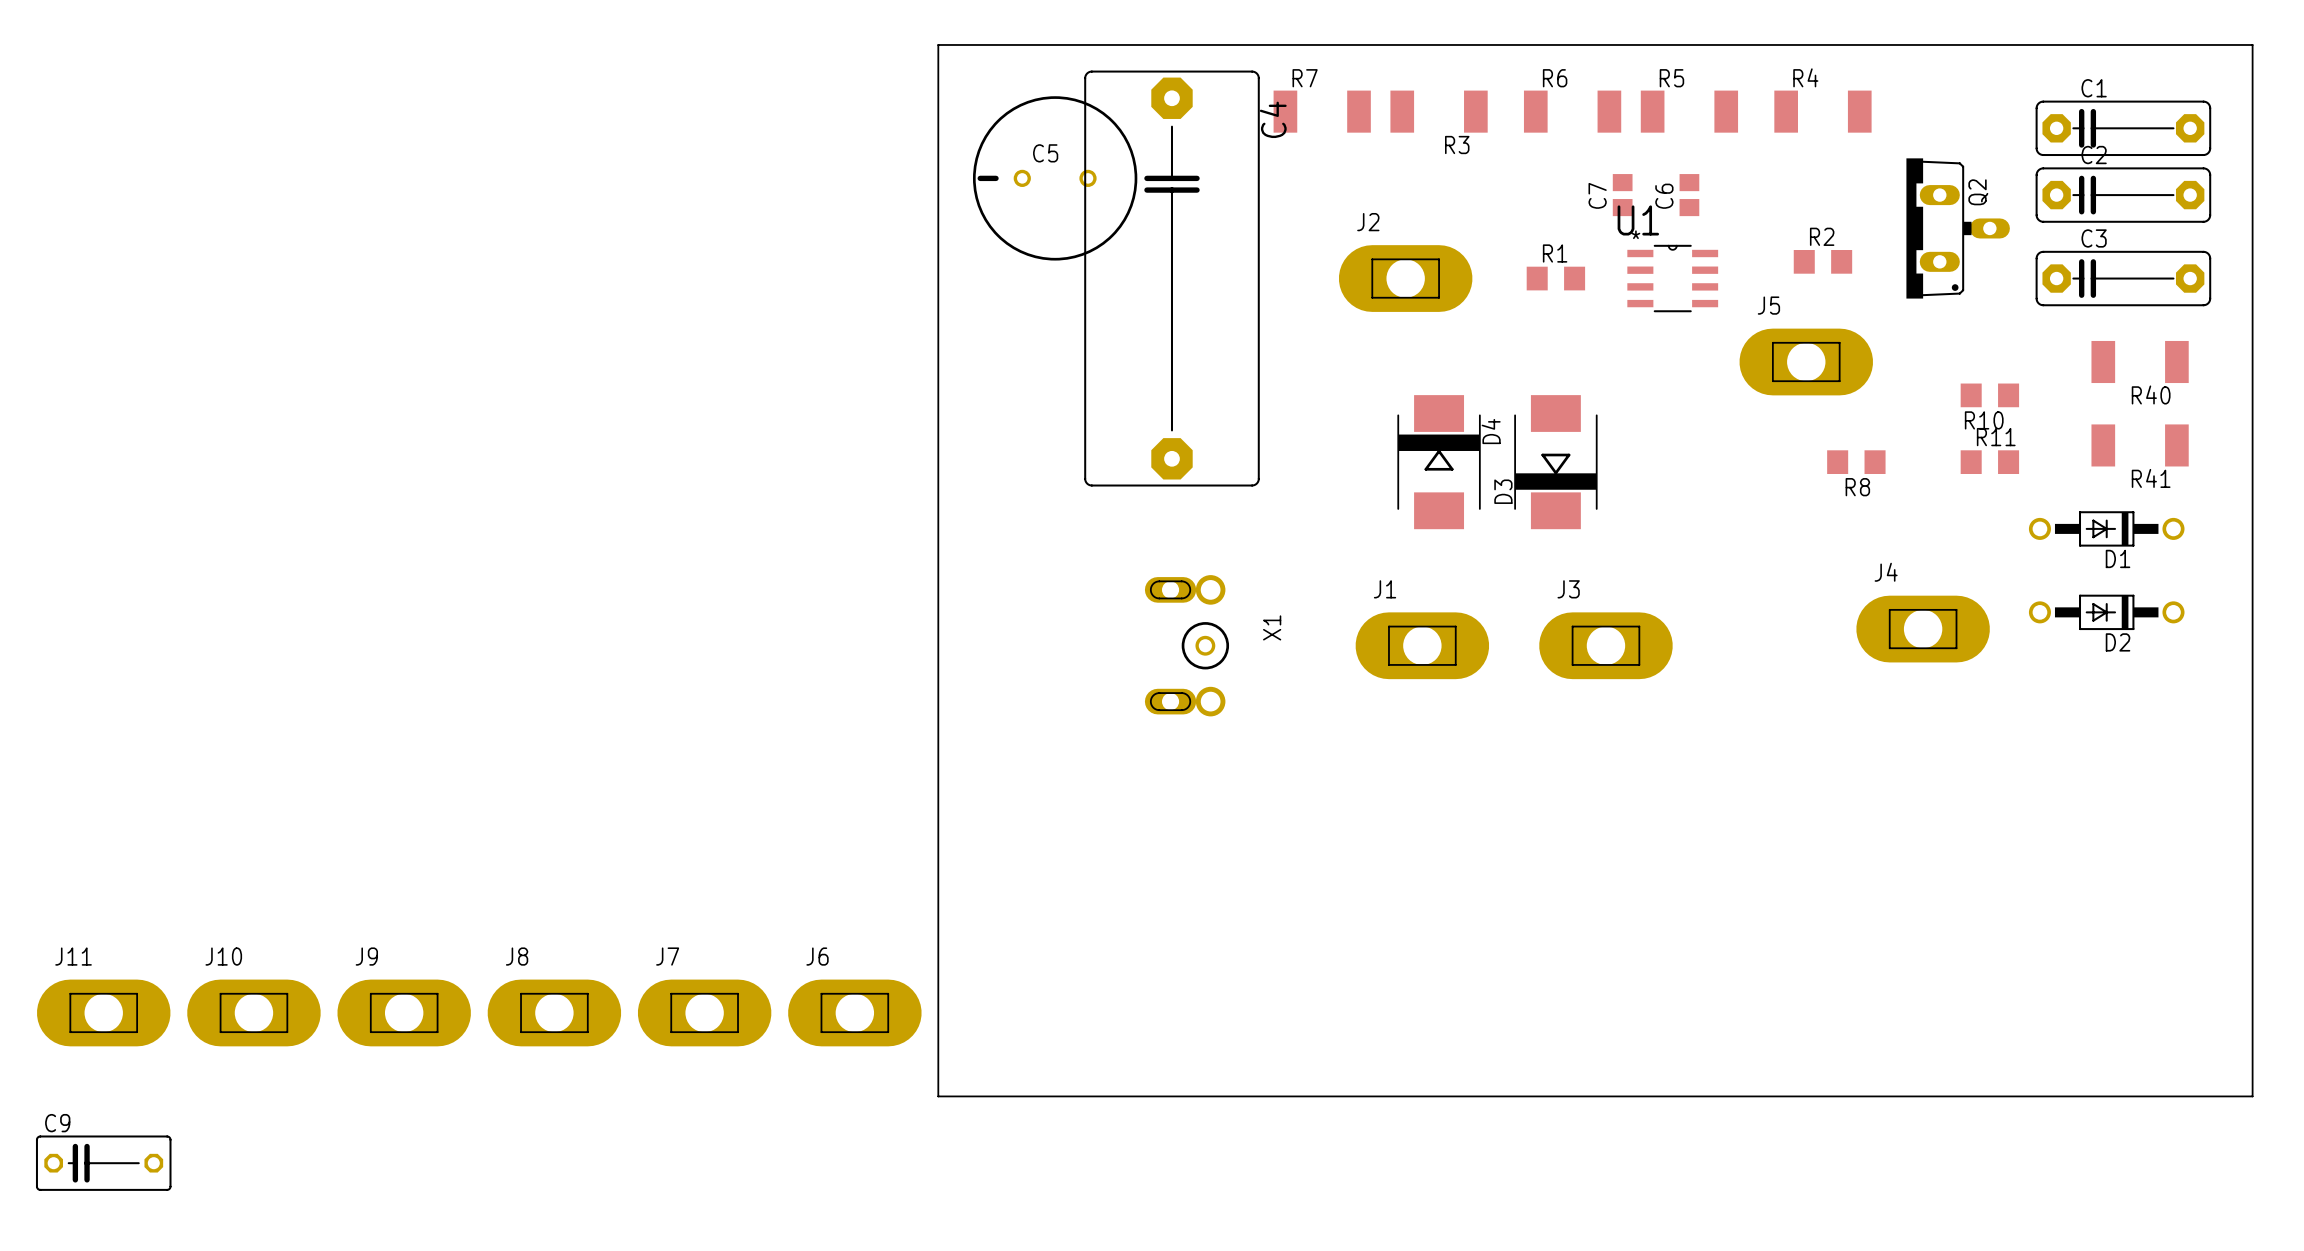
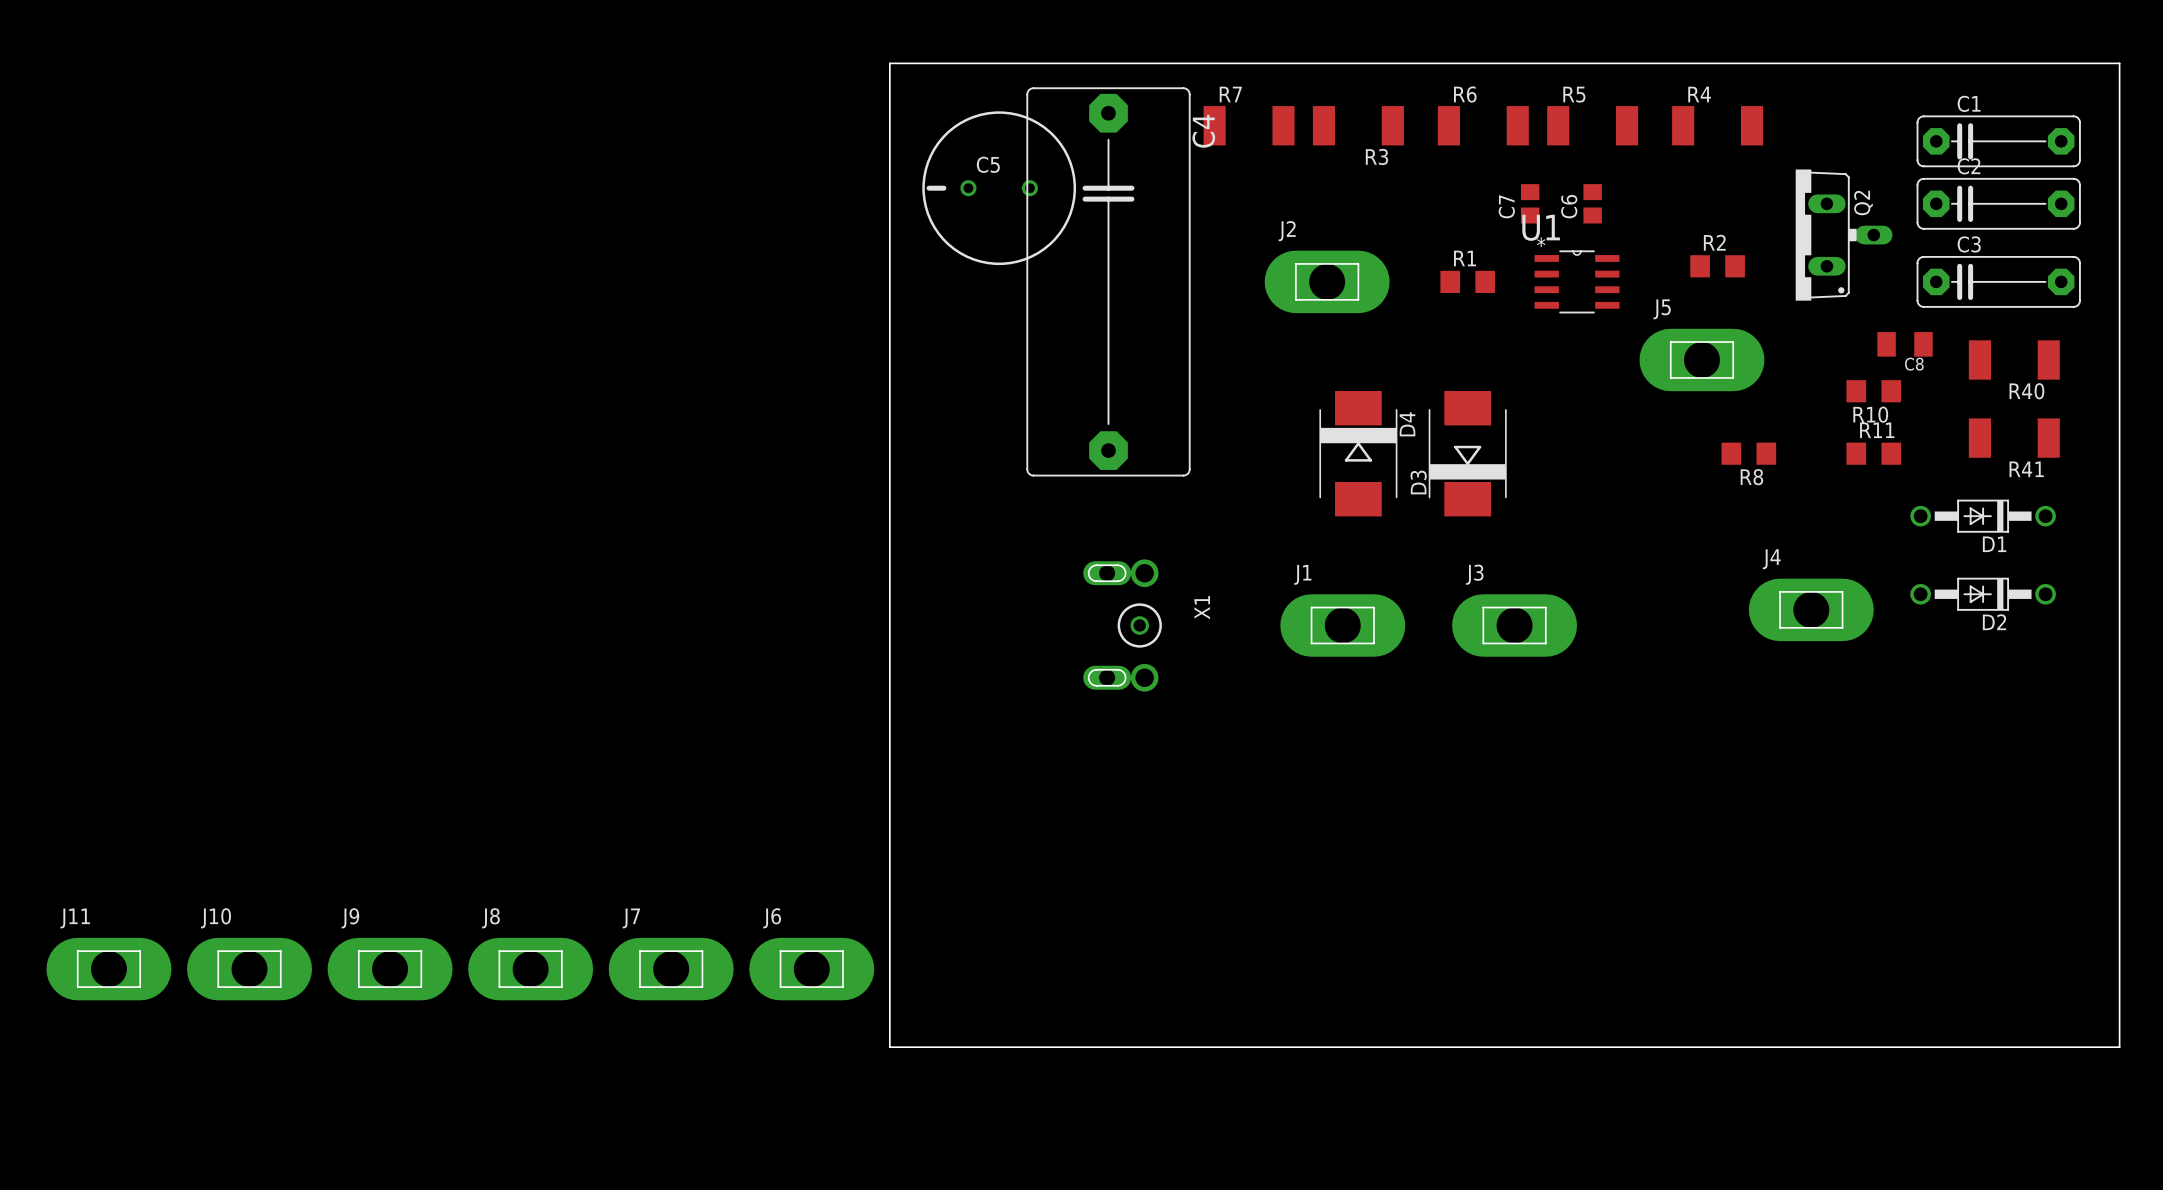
C8: none -> (1905, 344)
C9: (103, 1163) -> none

